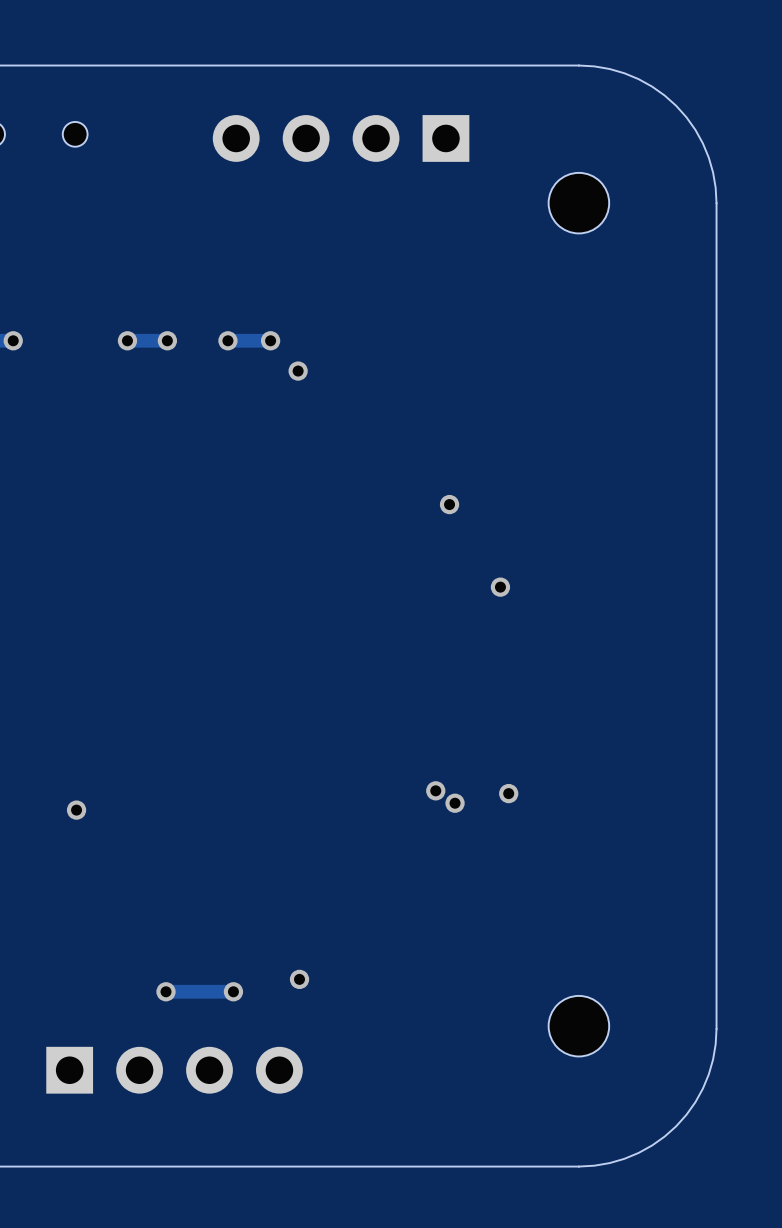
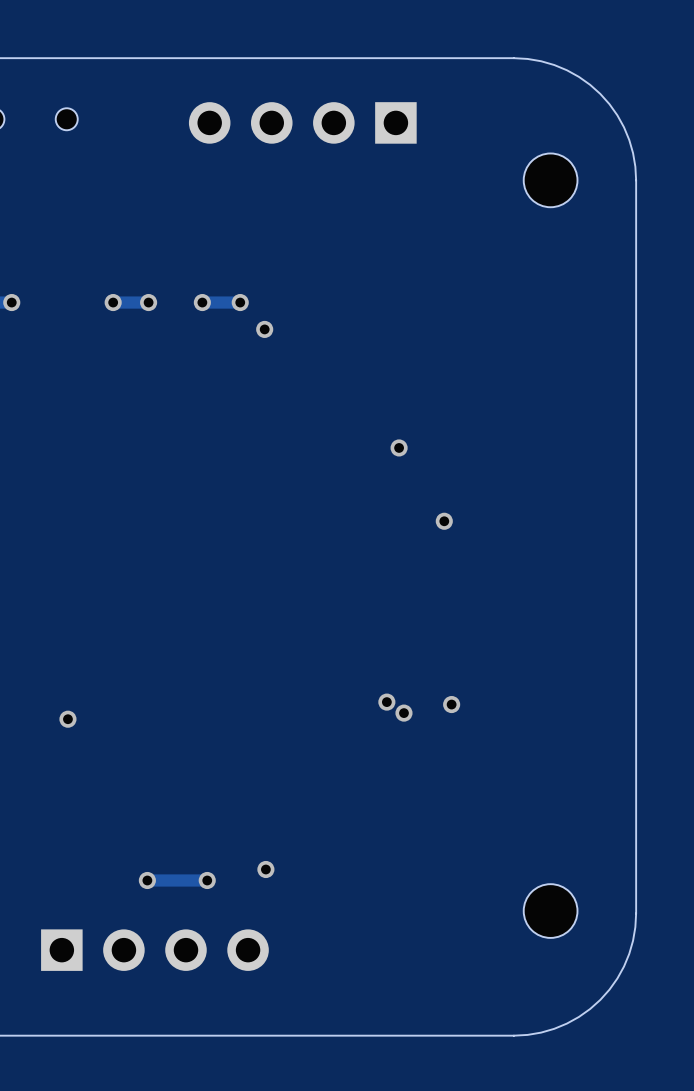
part position: (578, 203) -> (550, 180)
part position: (578, 1026) -> (550, 911)

